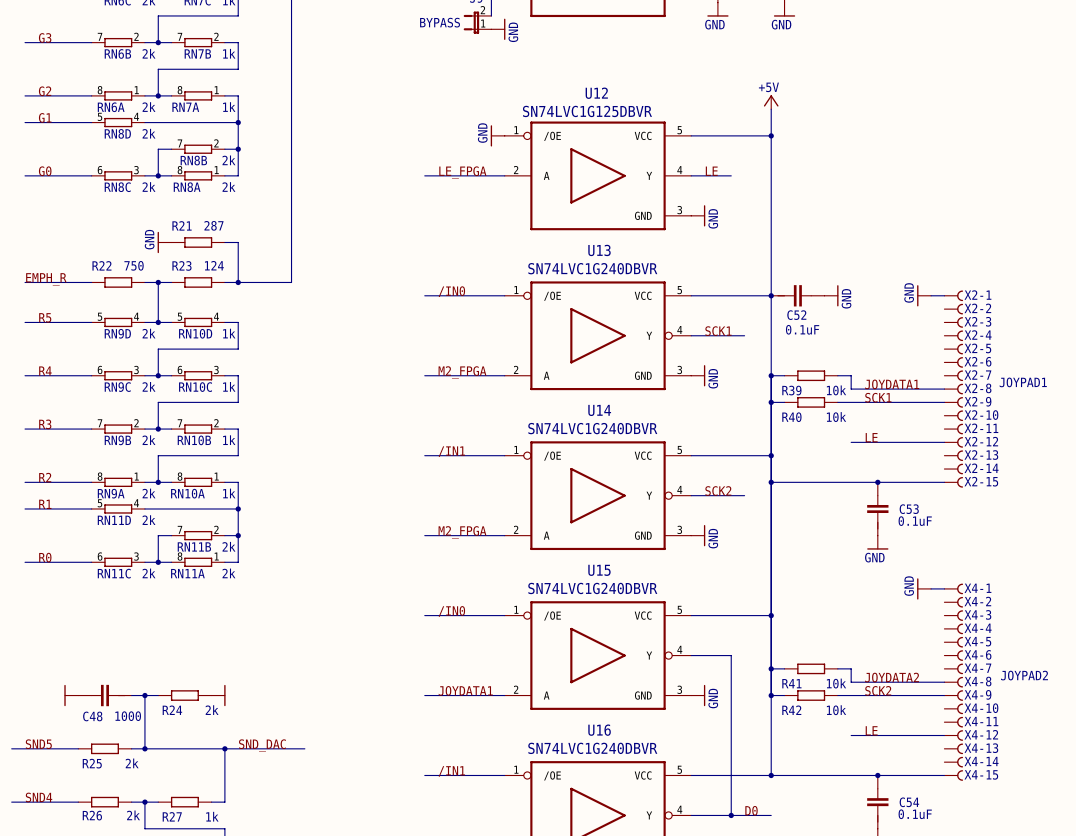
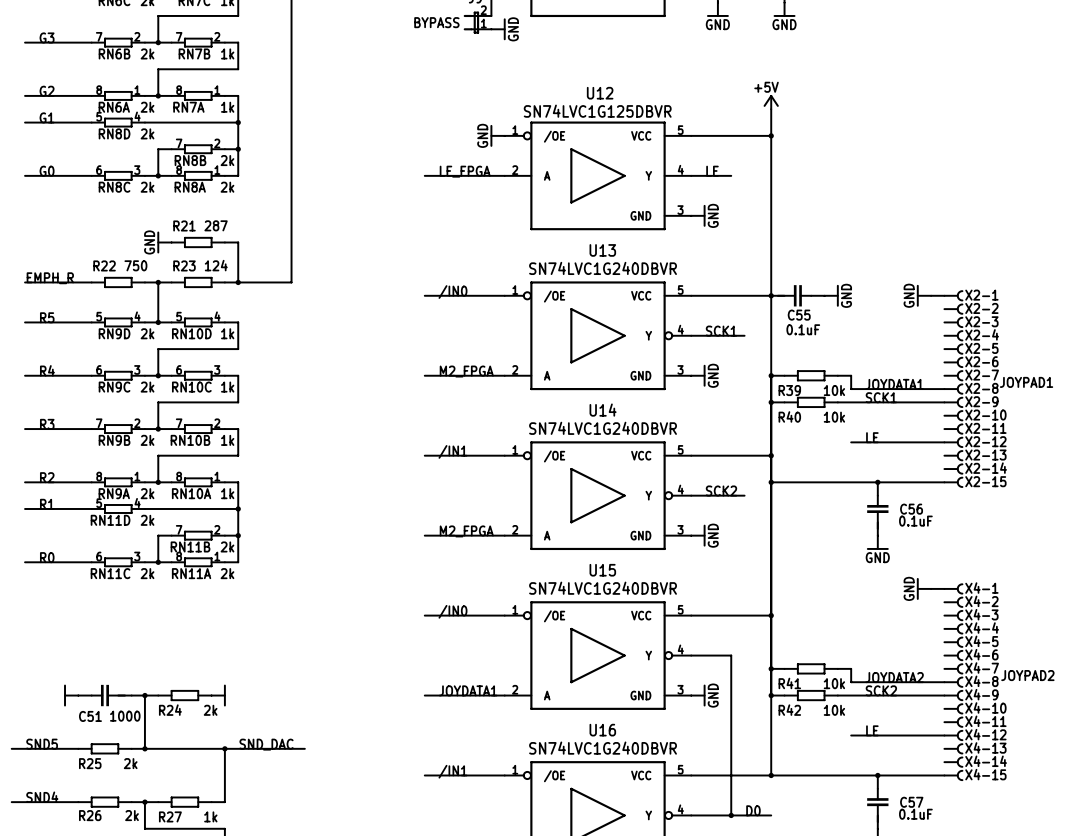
C52 name: C52 (796, 315) -> C55 (799, 315)
C53 name: C53 (909, 509) -> C56 (911, 509)
C48 name: C48 (92, 716) -> C51 (90, 716)
C54 name: C54 (909, 802) -> C57 (911, 802)

